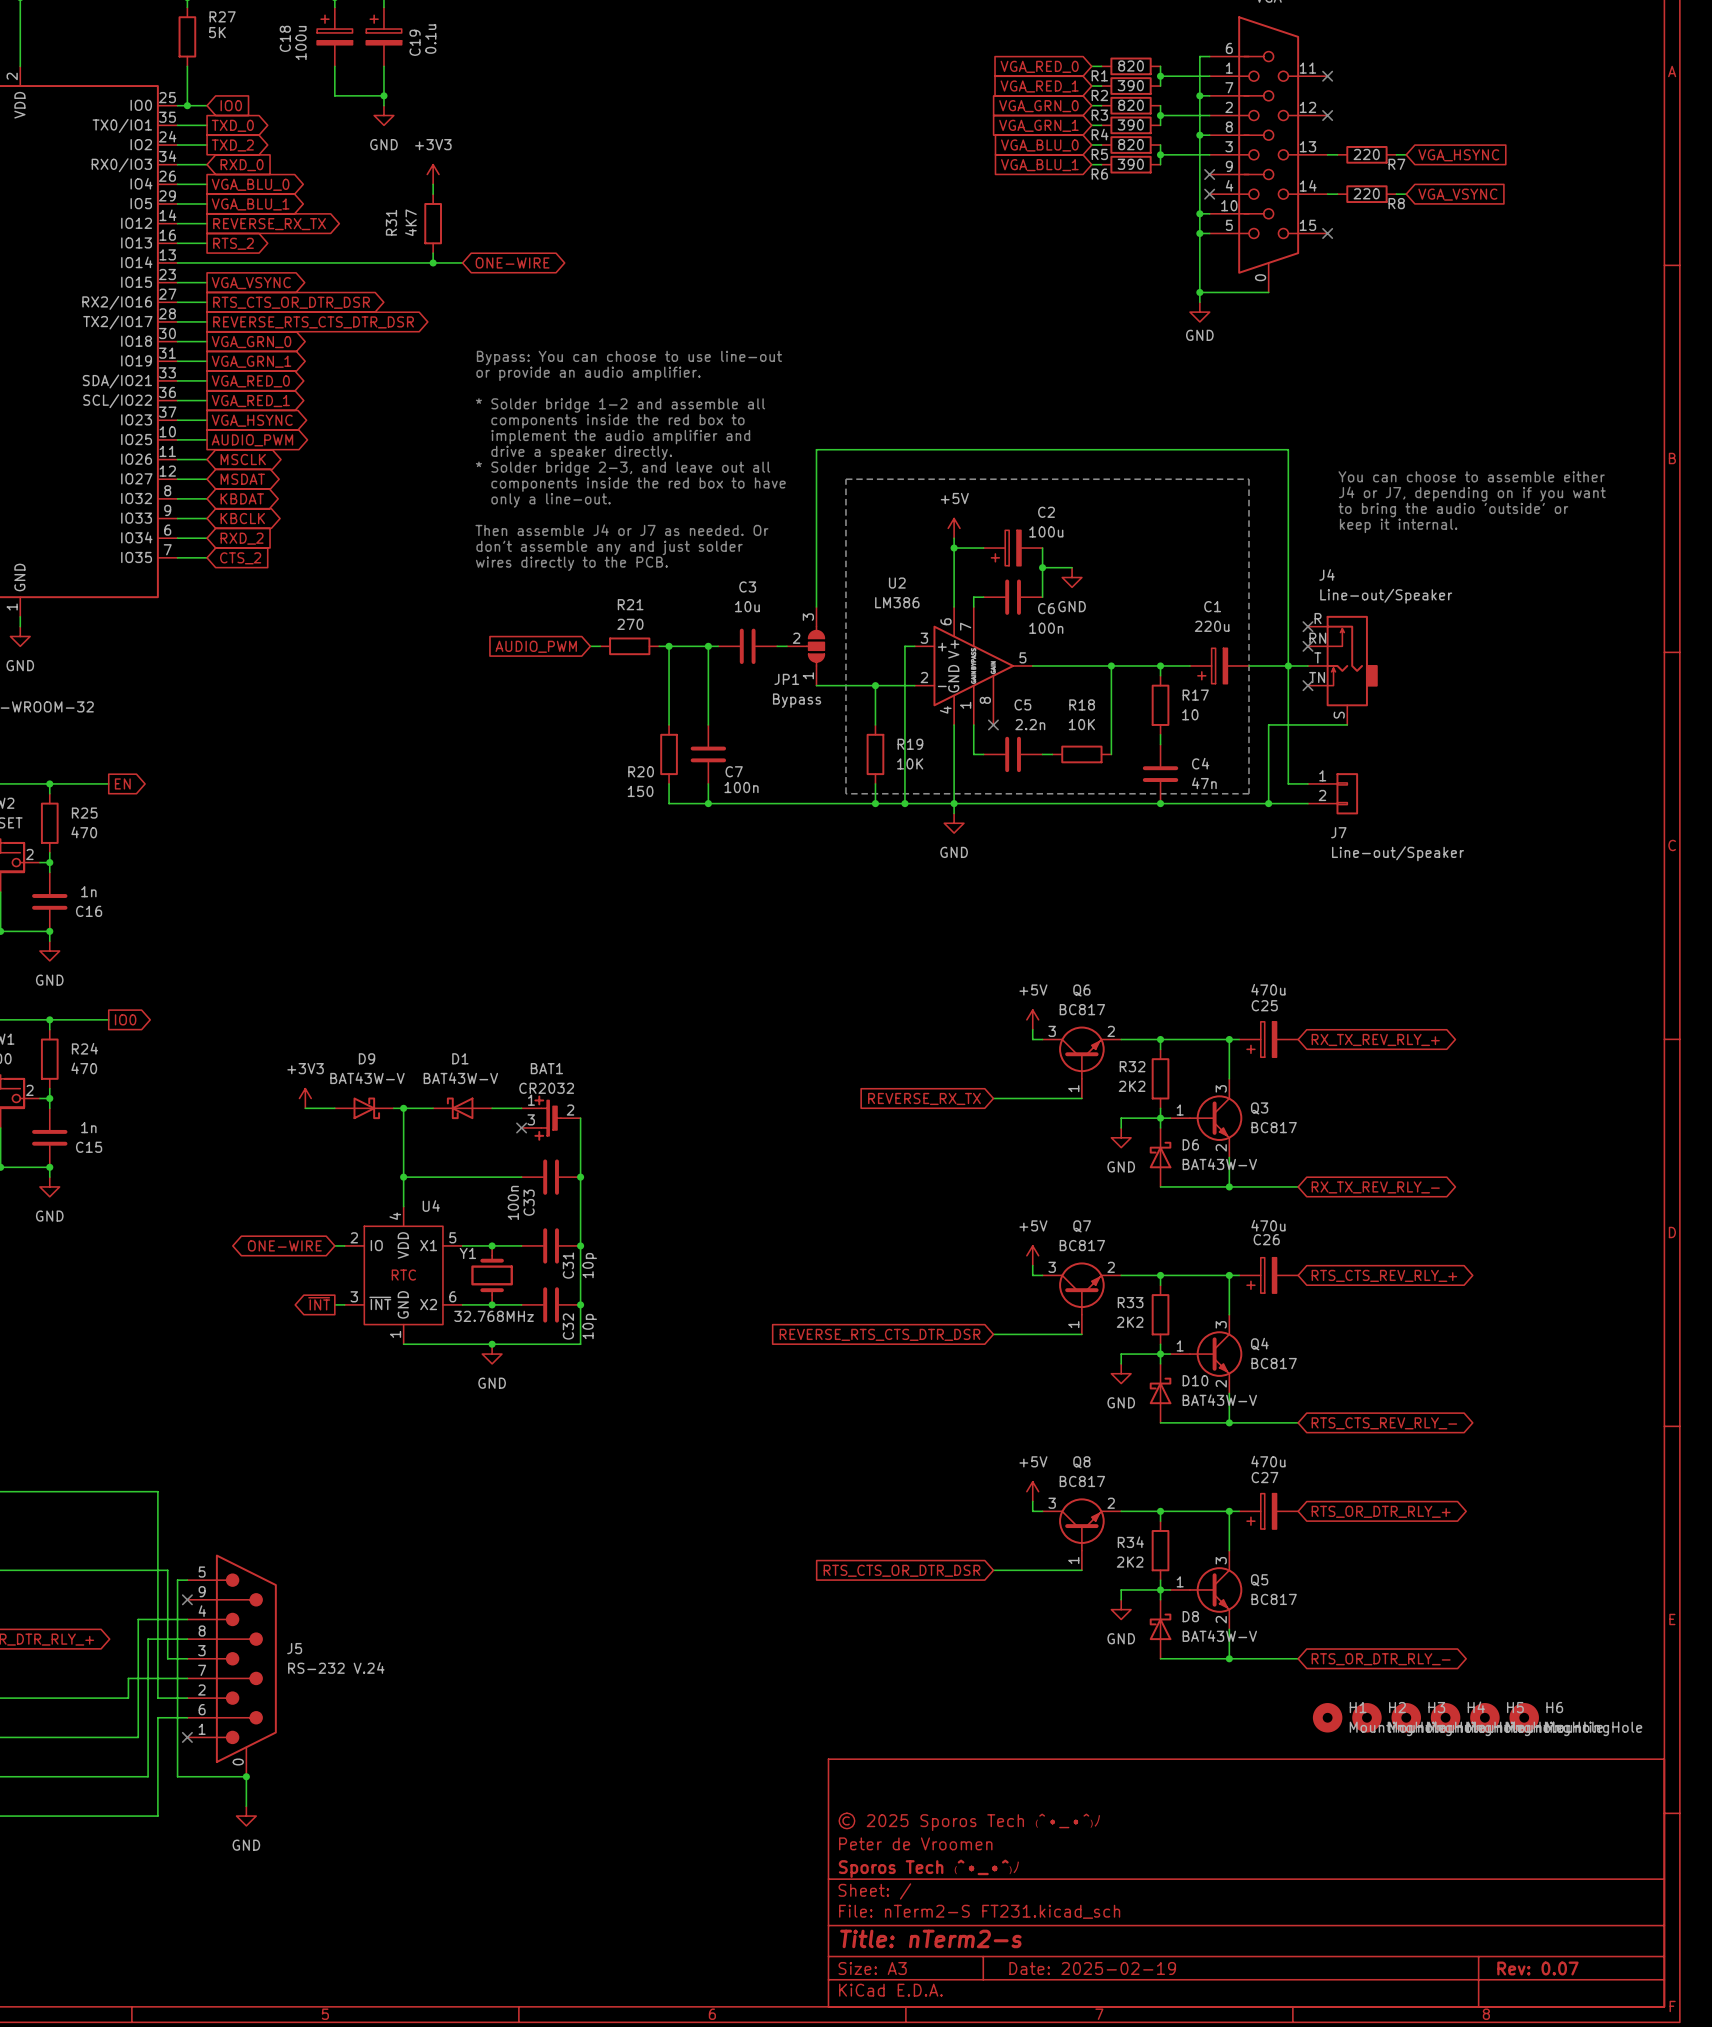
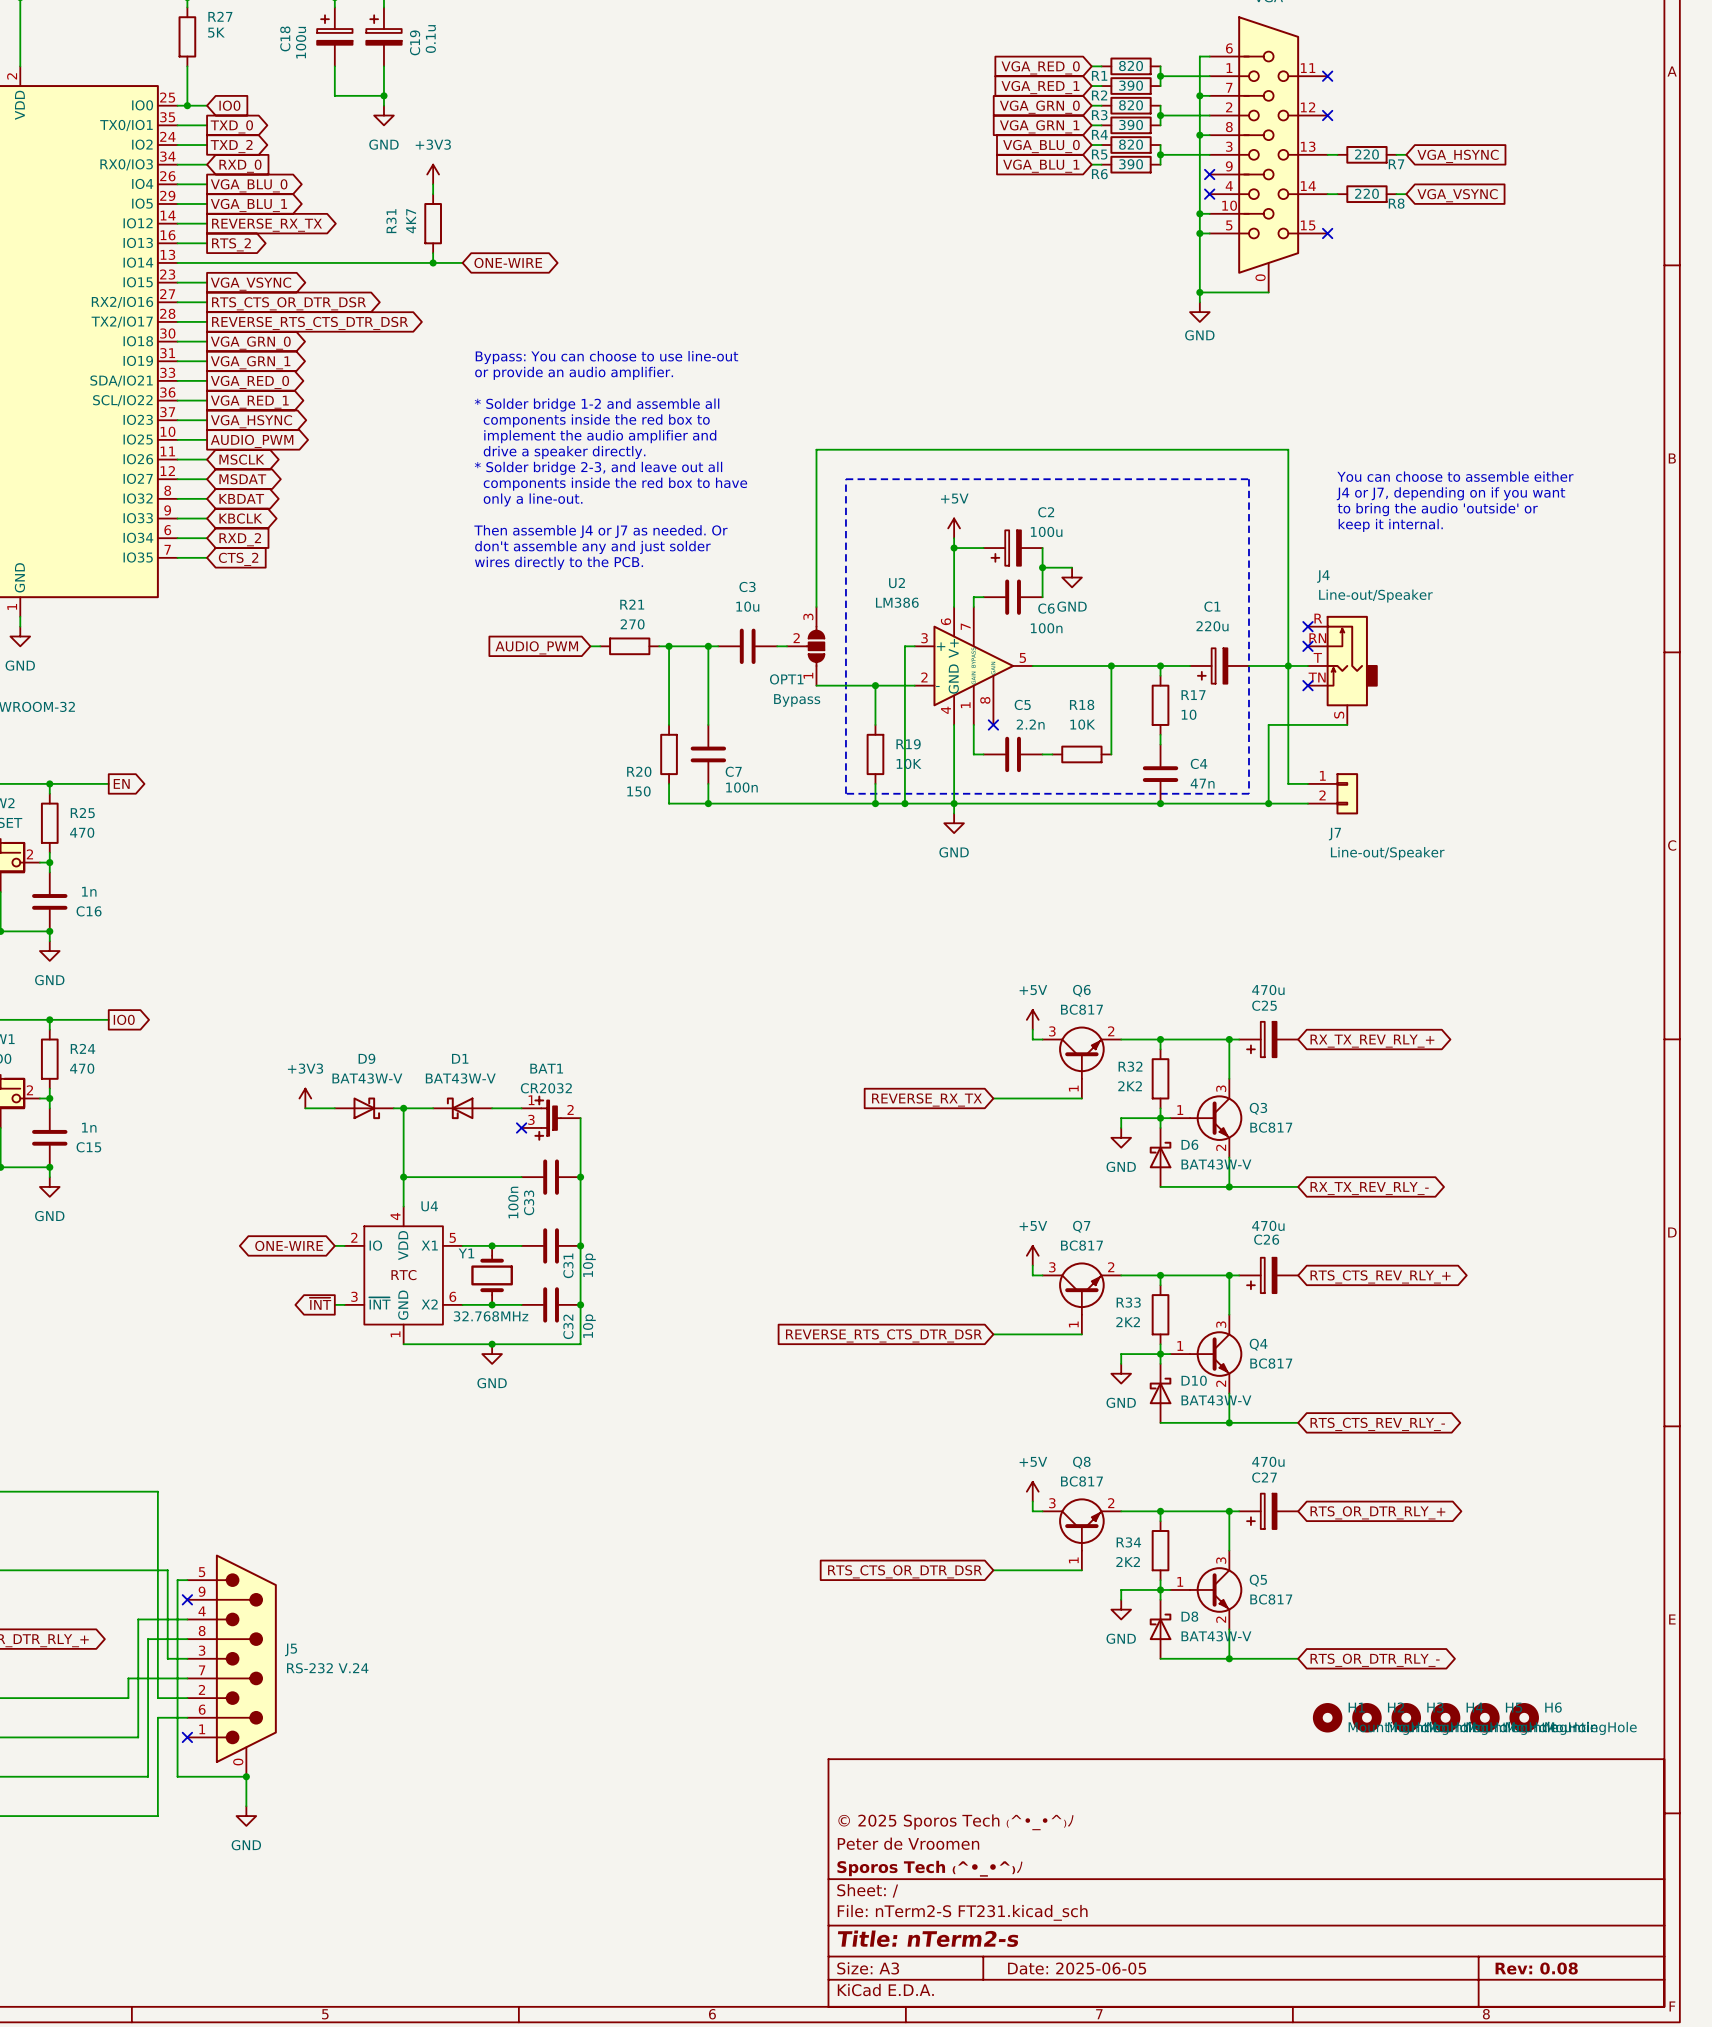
JP1 name: JP1 (786, 679) -> OPT1 (786, 679)
title block: Date: 2025-02-19 (1092, 1968) -> Date: 2025-06-05 (1077, 1968)
title block: Rev: 0.07 (1537, 1968) -> Rev: 0.08 (1536, 1968)

